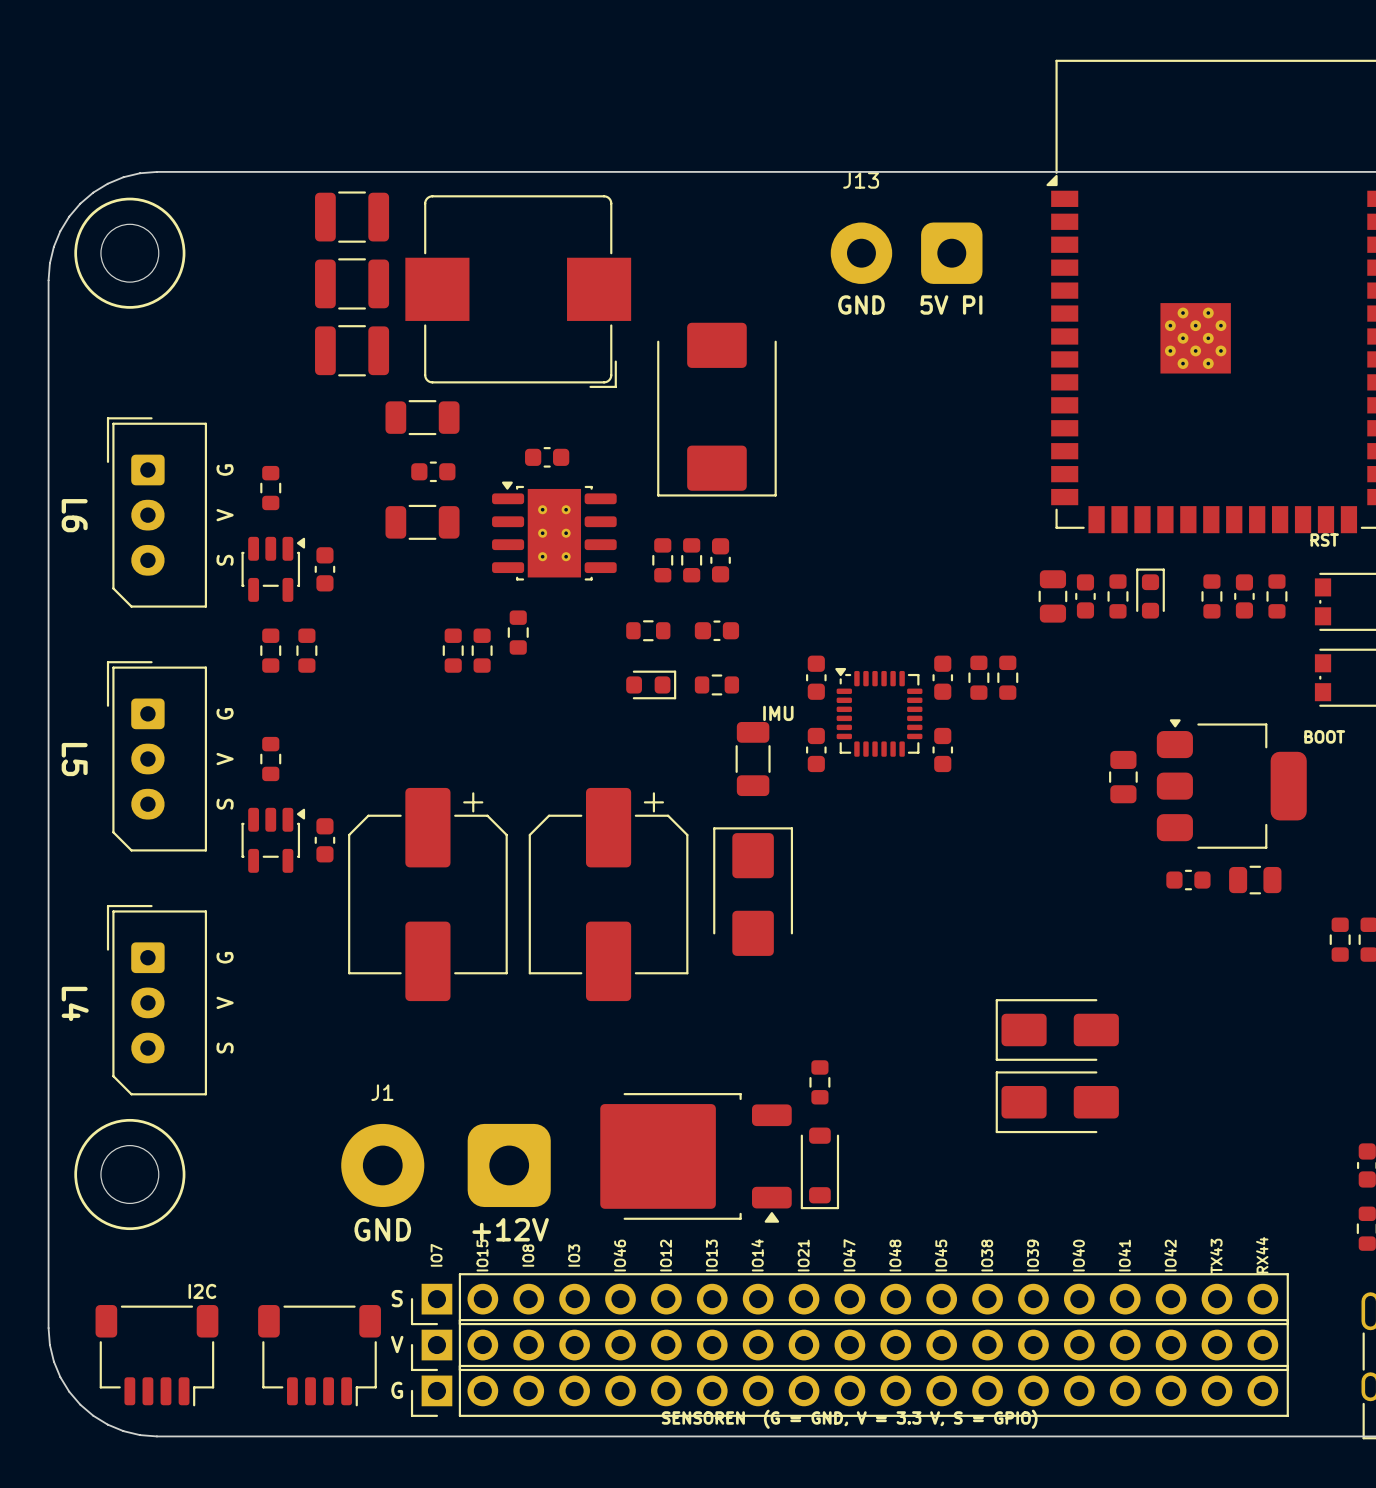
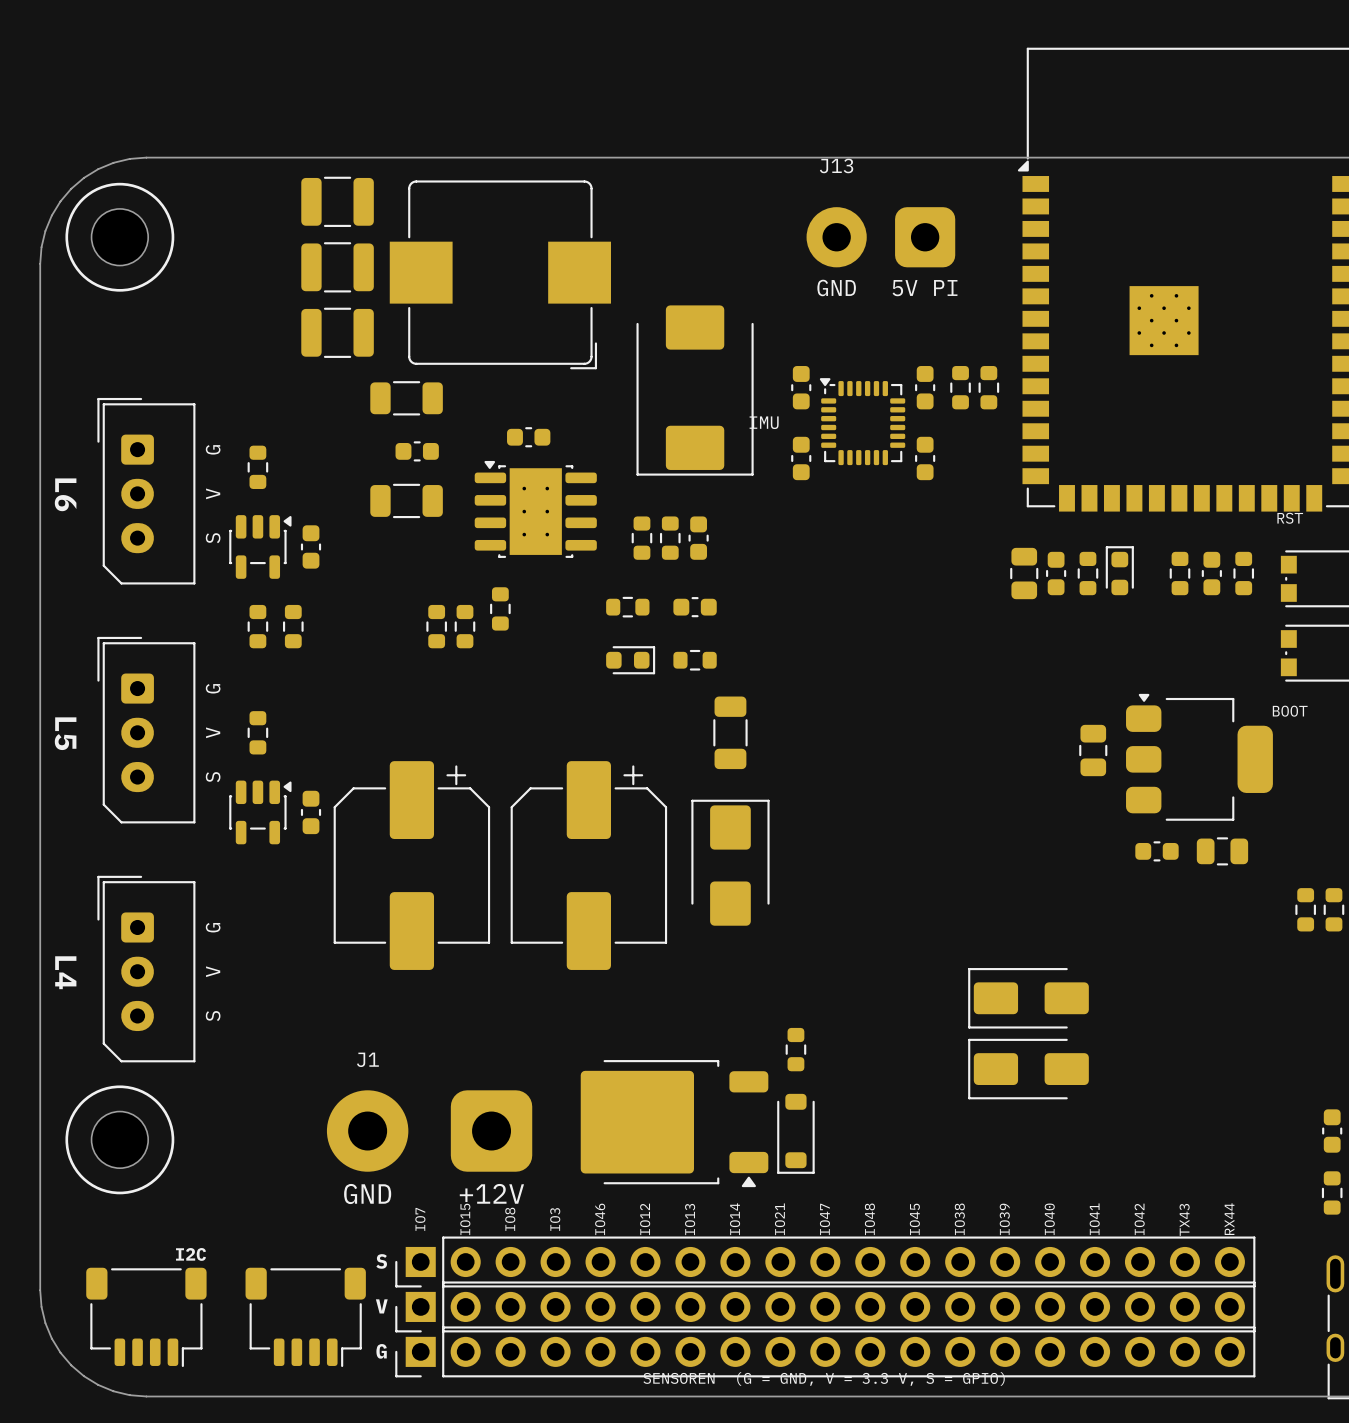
part: none -> (801, 387)
part: none -> (925, 387)
part: none -> (960, 387)
part: none -> (988, 387)
part: none -> (801, 458)
part: none -> (925, 458)
part: (816, 677) -> none
part: (942, 677) -> none
part: (978, 677) -> none
part: (1007, 677) -> none
part position: (878, 712) -> (862, 421)
text position: IMU (778, 713) -> IMU (764, 422)
part: (816, 749) -> none
part: (942, 749) -> none

